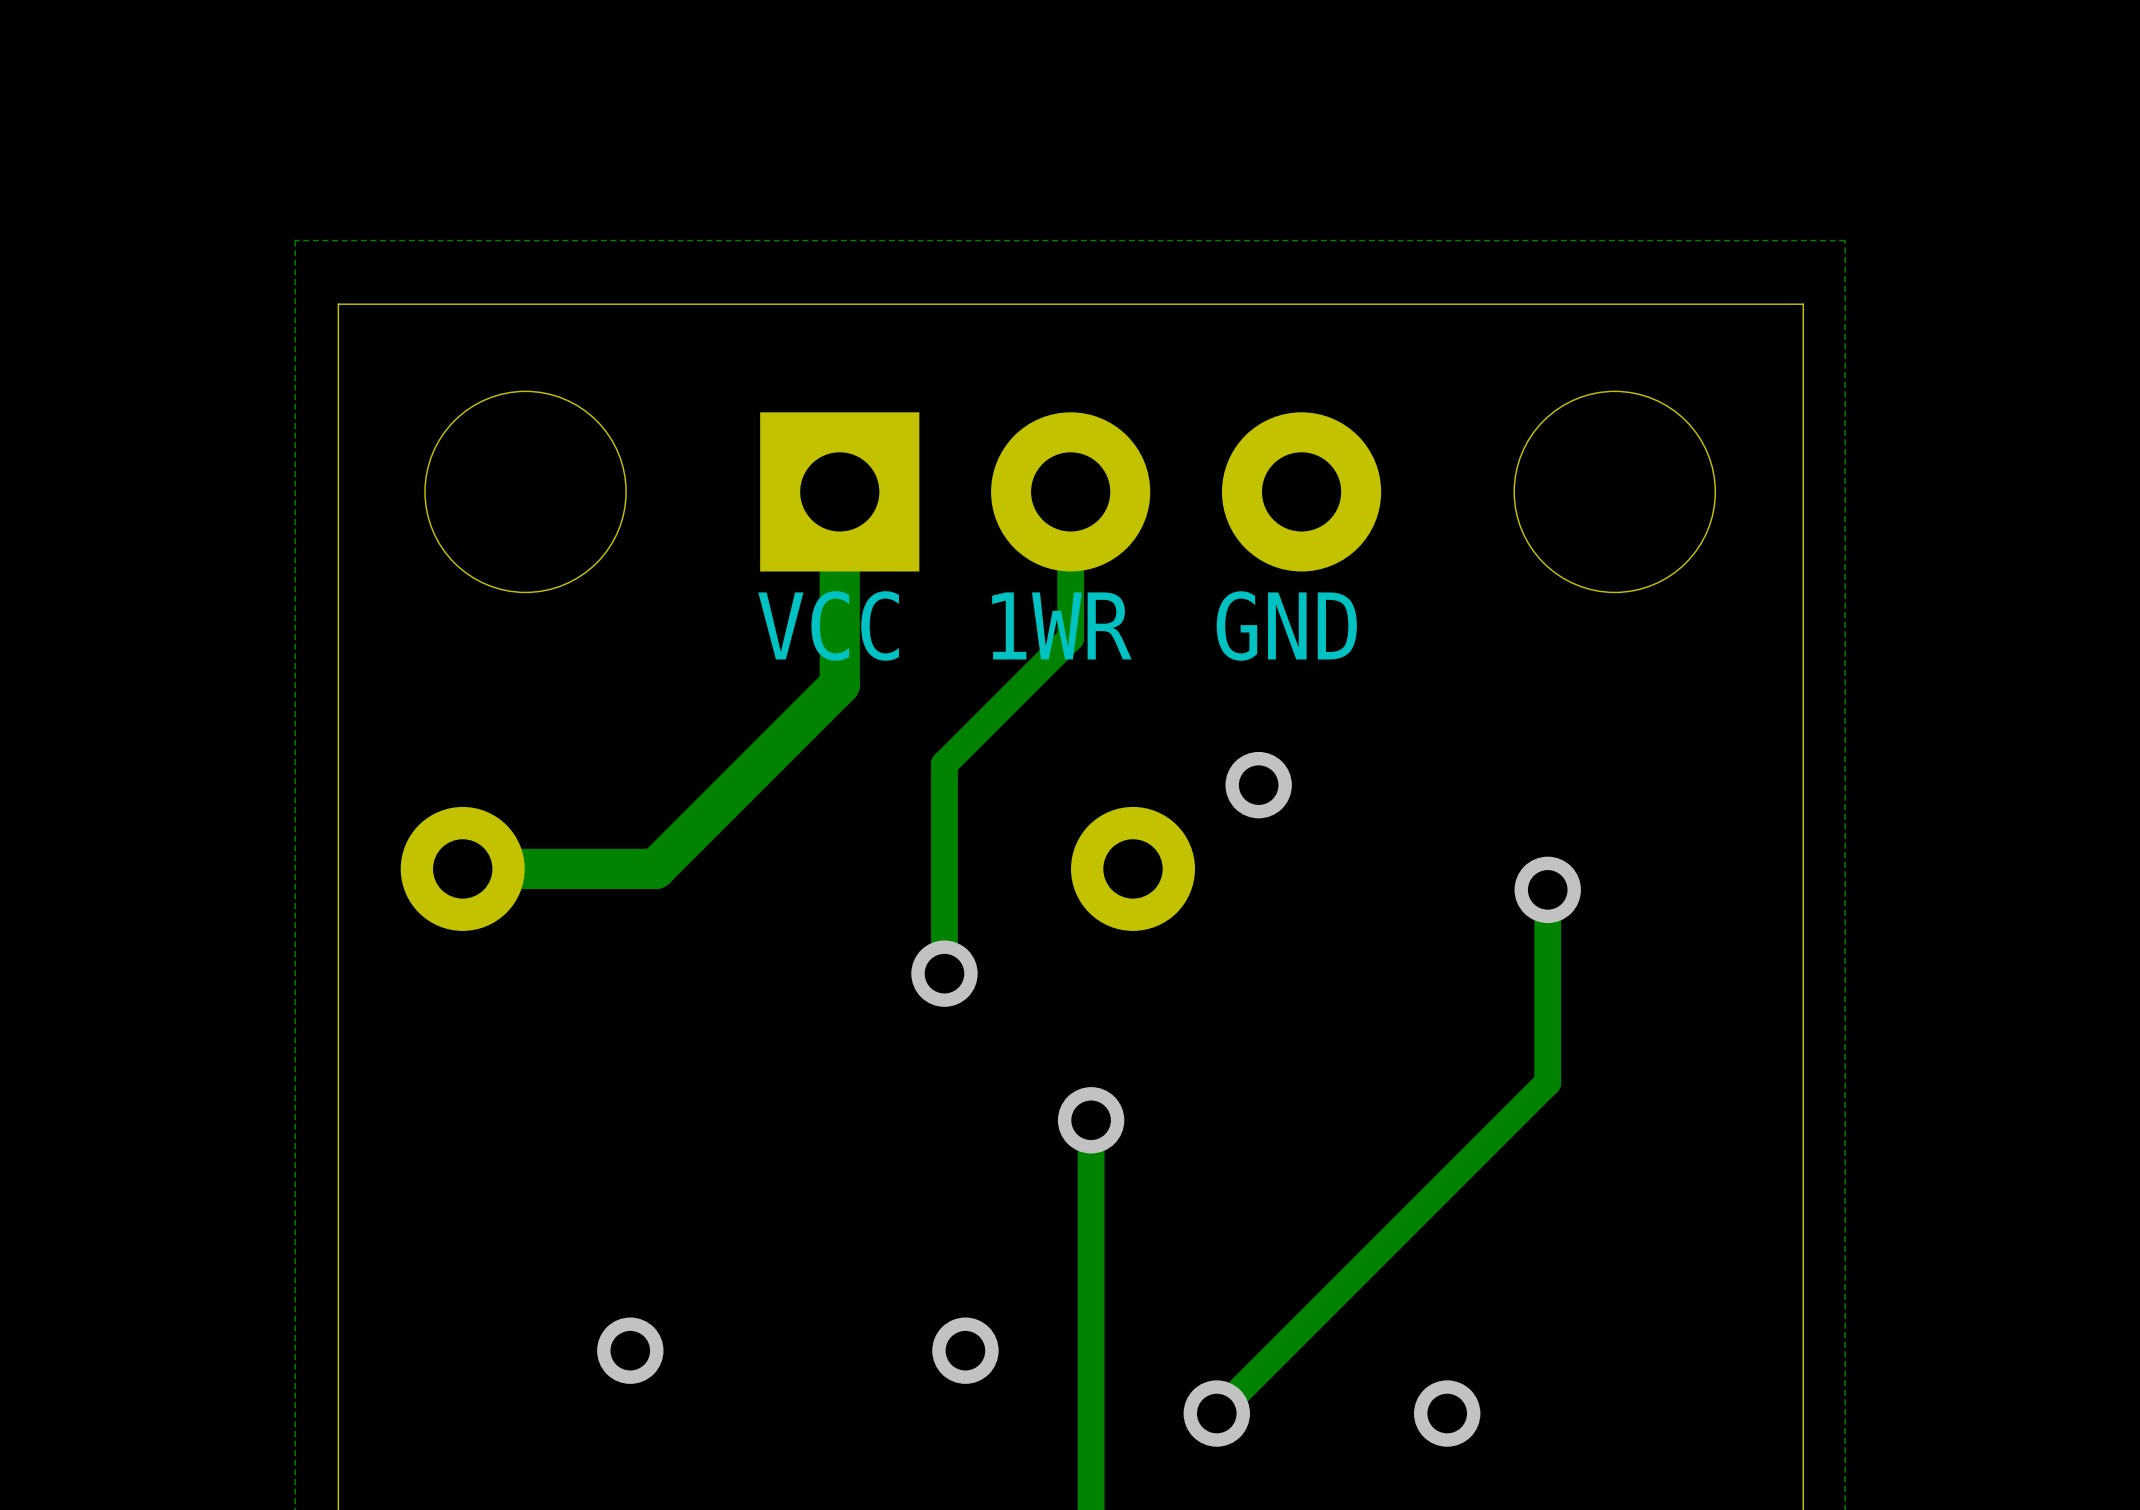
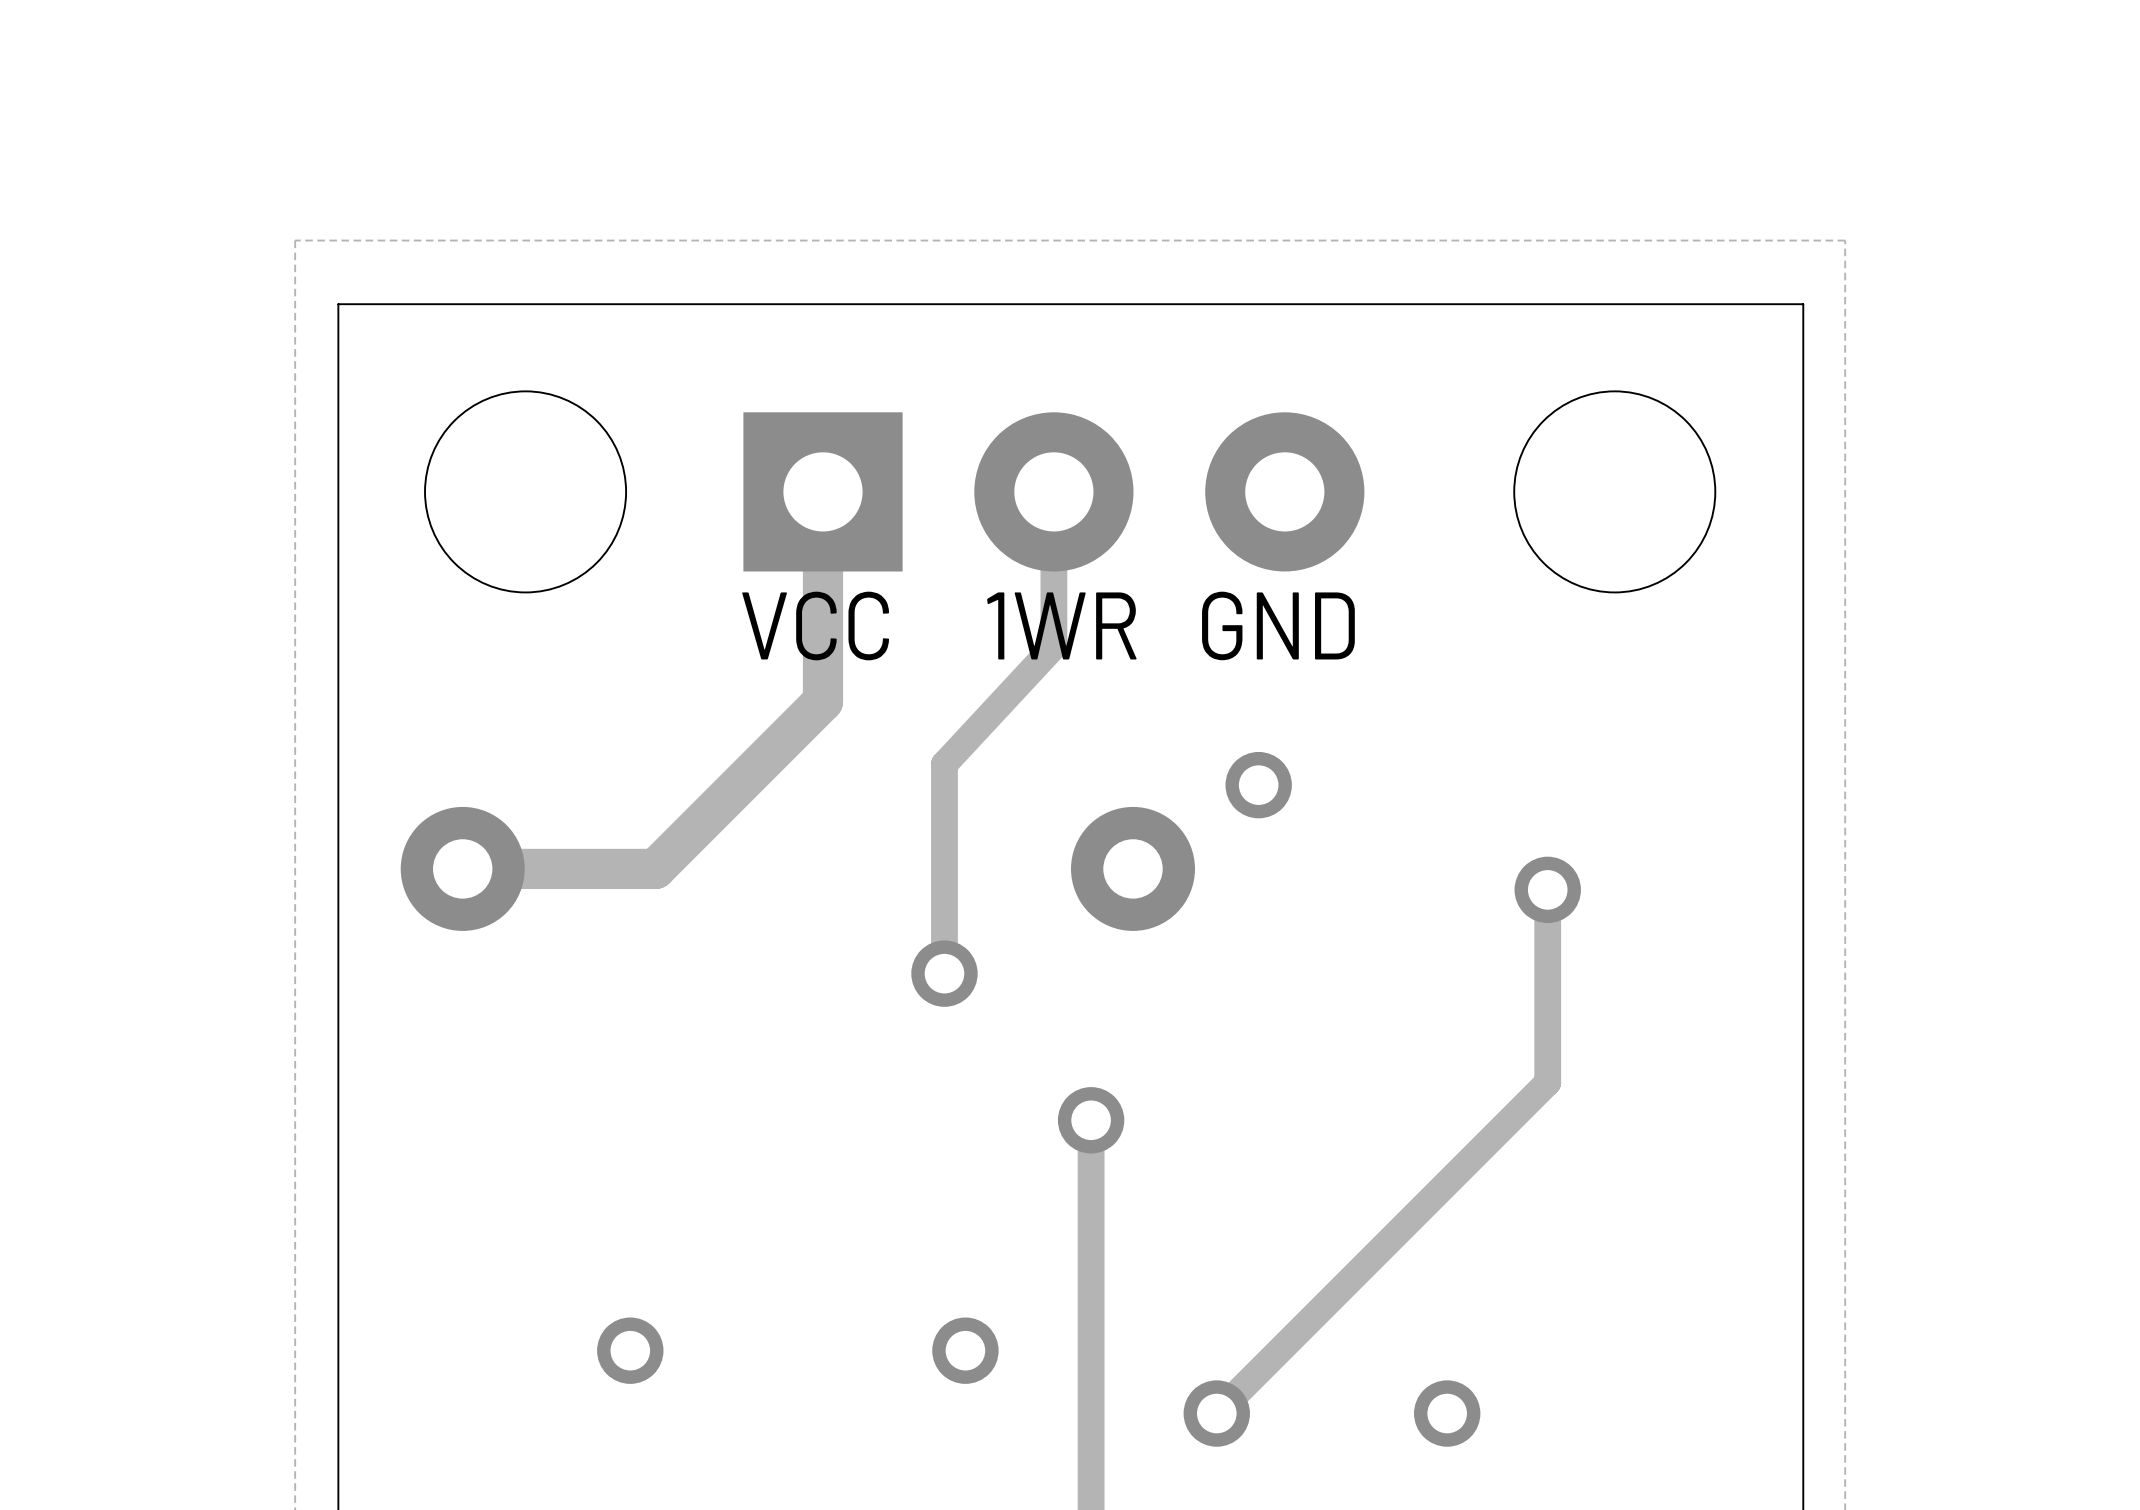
track: (839, 491) (839, 684) (822, 701) -> (822, 491) (822, 701)
track: (1070, 491) (1070, 638) (944, 764) -> (1053, 491) (1053, 646) (944, 764)
part position: (1070, 491) -> (1053, 491)
text position: VCC (828, 626) -> VCC (815, 626)
text position: GND (1286, 626) -> GND (1278, 625)

